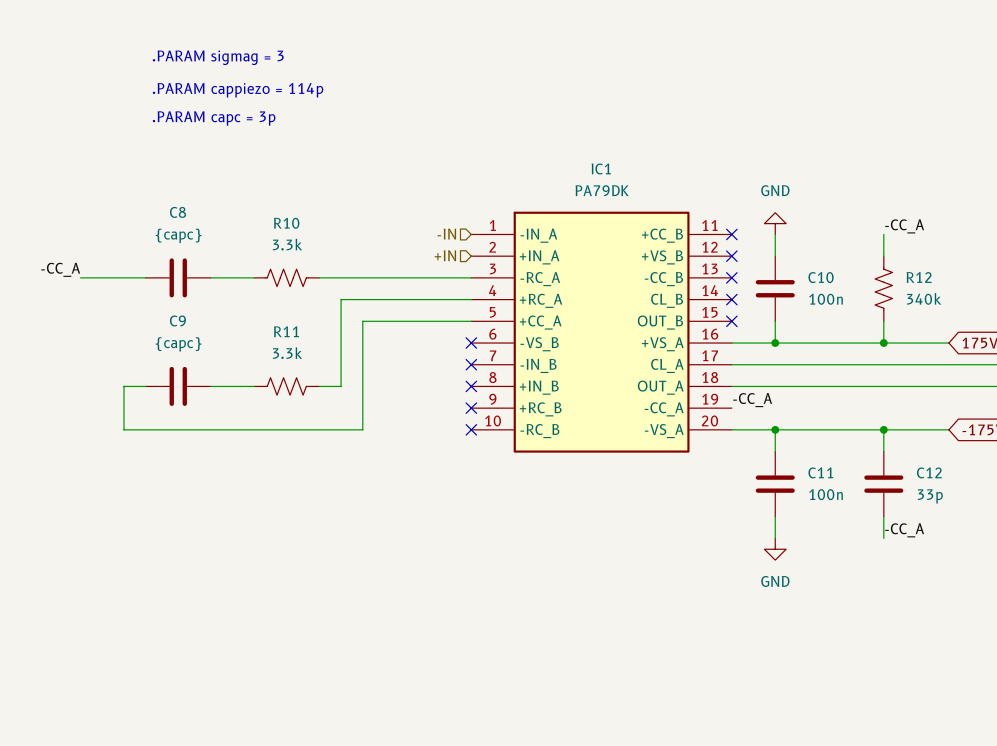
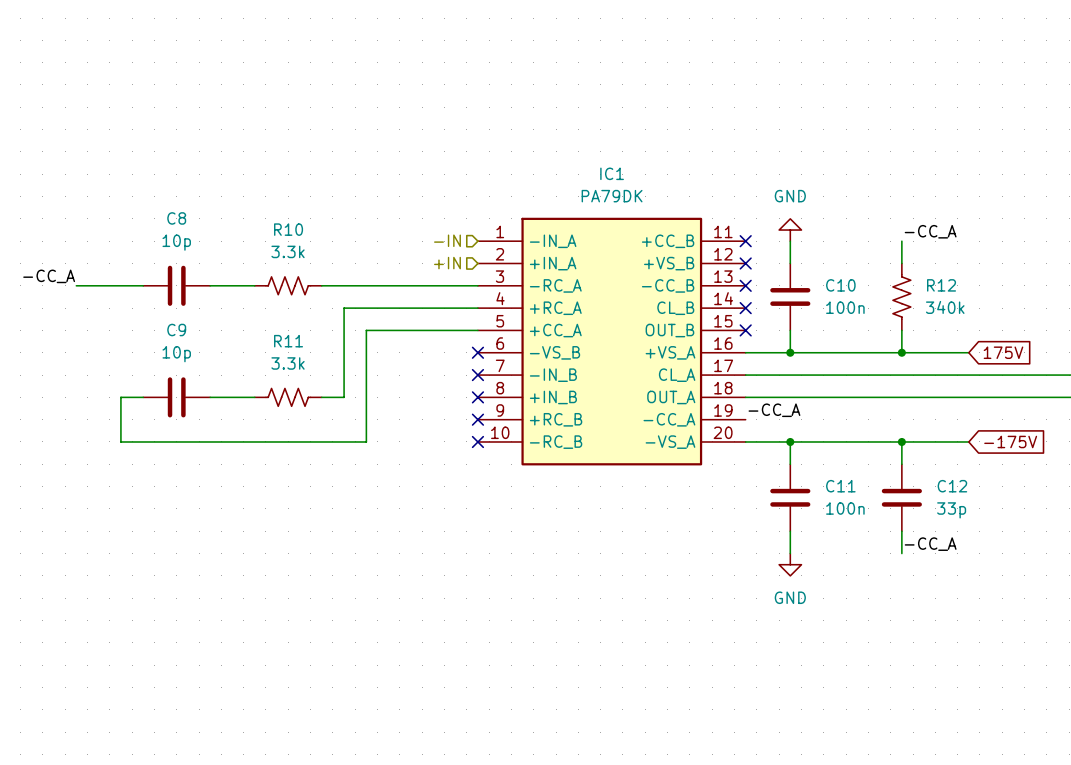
text: .PARAM sigmag = 3 (218, 57) -> none
text: .PARAM cappiezo = 114p (238, 90) -> none
text: .PARAM capc = 3p (214, 118) -> none
C8 value: {capc} (178, 235) -> 10p (176, 242)
C9 value: {capc} (178, 344) -> 10p (176, 354)

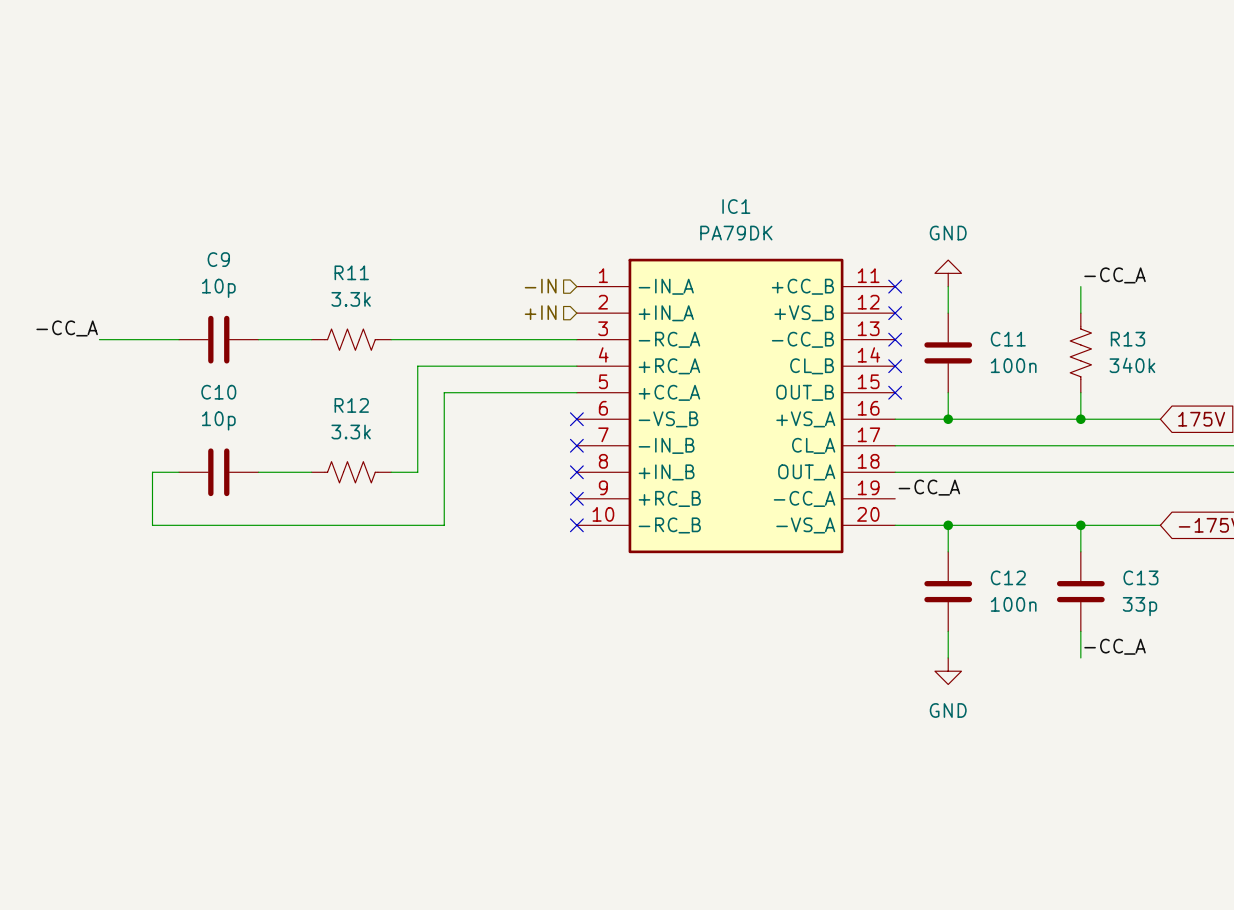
C8 name: C8 (176, 218) -> C9 (218, 259)
R10 name: R10 (288, 229) -> R11 (351, 272)
C10 name: C10 (840, 285) -> C11 (1008, 339)
R12 name: R12 (941, 285) -> R13 (1127, 339)
C9 name: C9 (176, 330) -> C10 (218, 392)
R11 name: R11 (288, 341) -> R12 (351, 405)
C11 name: C11 (840, 486) -> C12 (1008, 577)
C12 name: C12 (952, 486) -> C13 (1140, 577)

